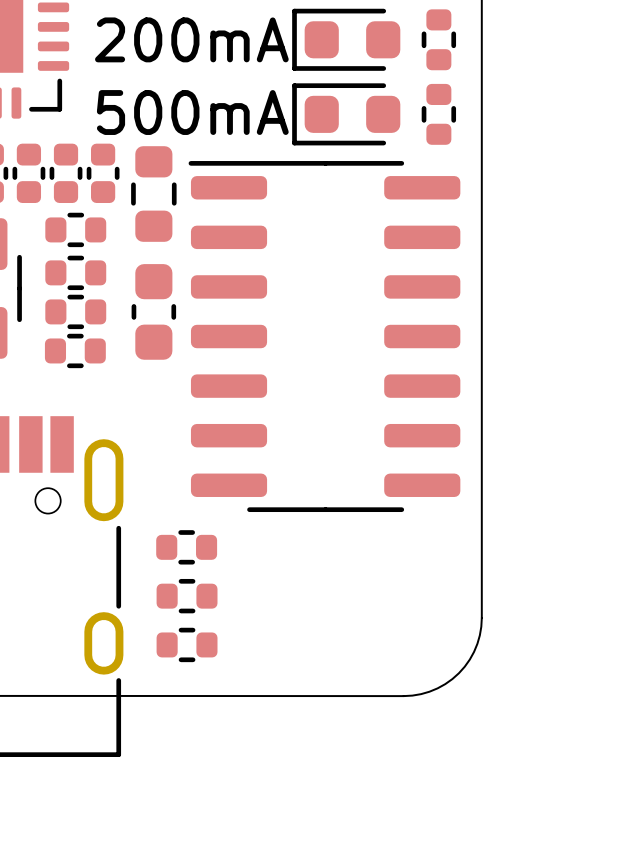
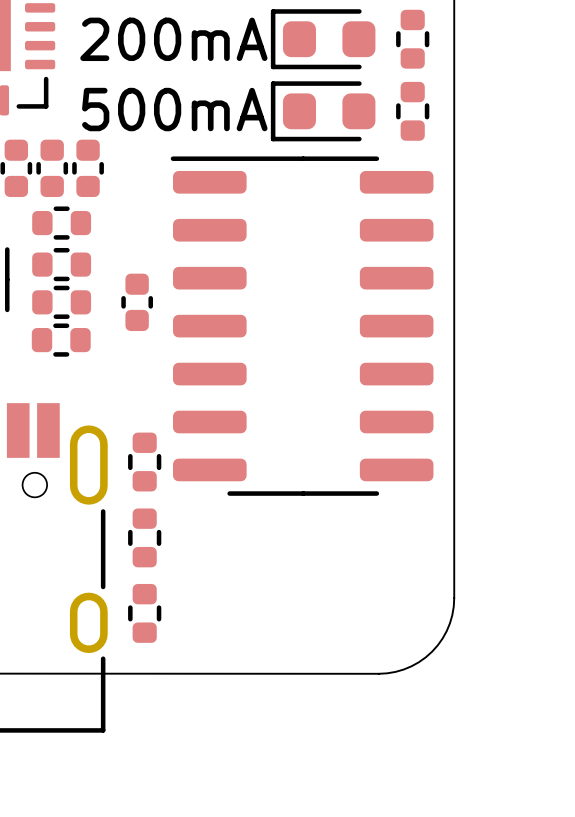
part: (153, 194) -> none
part footprint: [131, 264, 177, 360] -> [121, 273, 153, 332]
part: none -> (144, 462)
part: (186, 547) -> none
part: none -> (144, 537)
part: (187, 596) -> none
part: none -> (144, 613)
part: (187, 644) -> none

